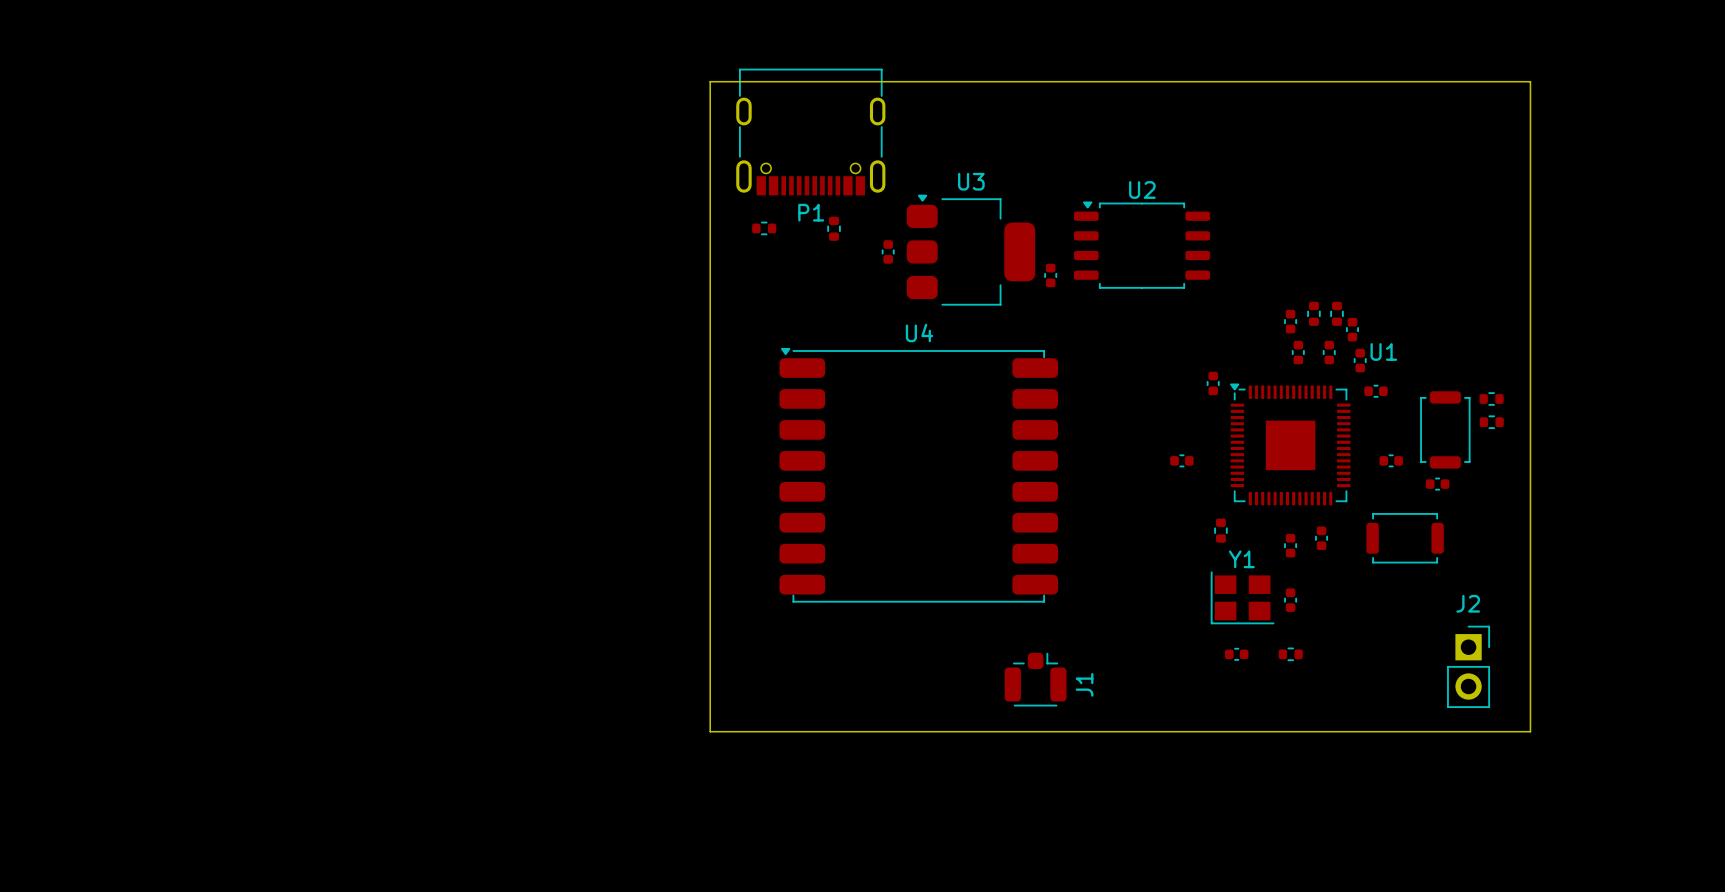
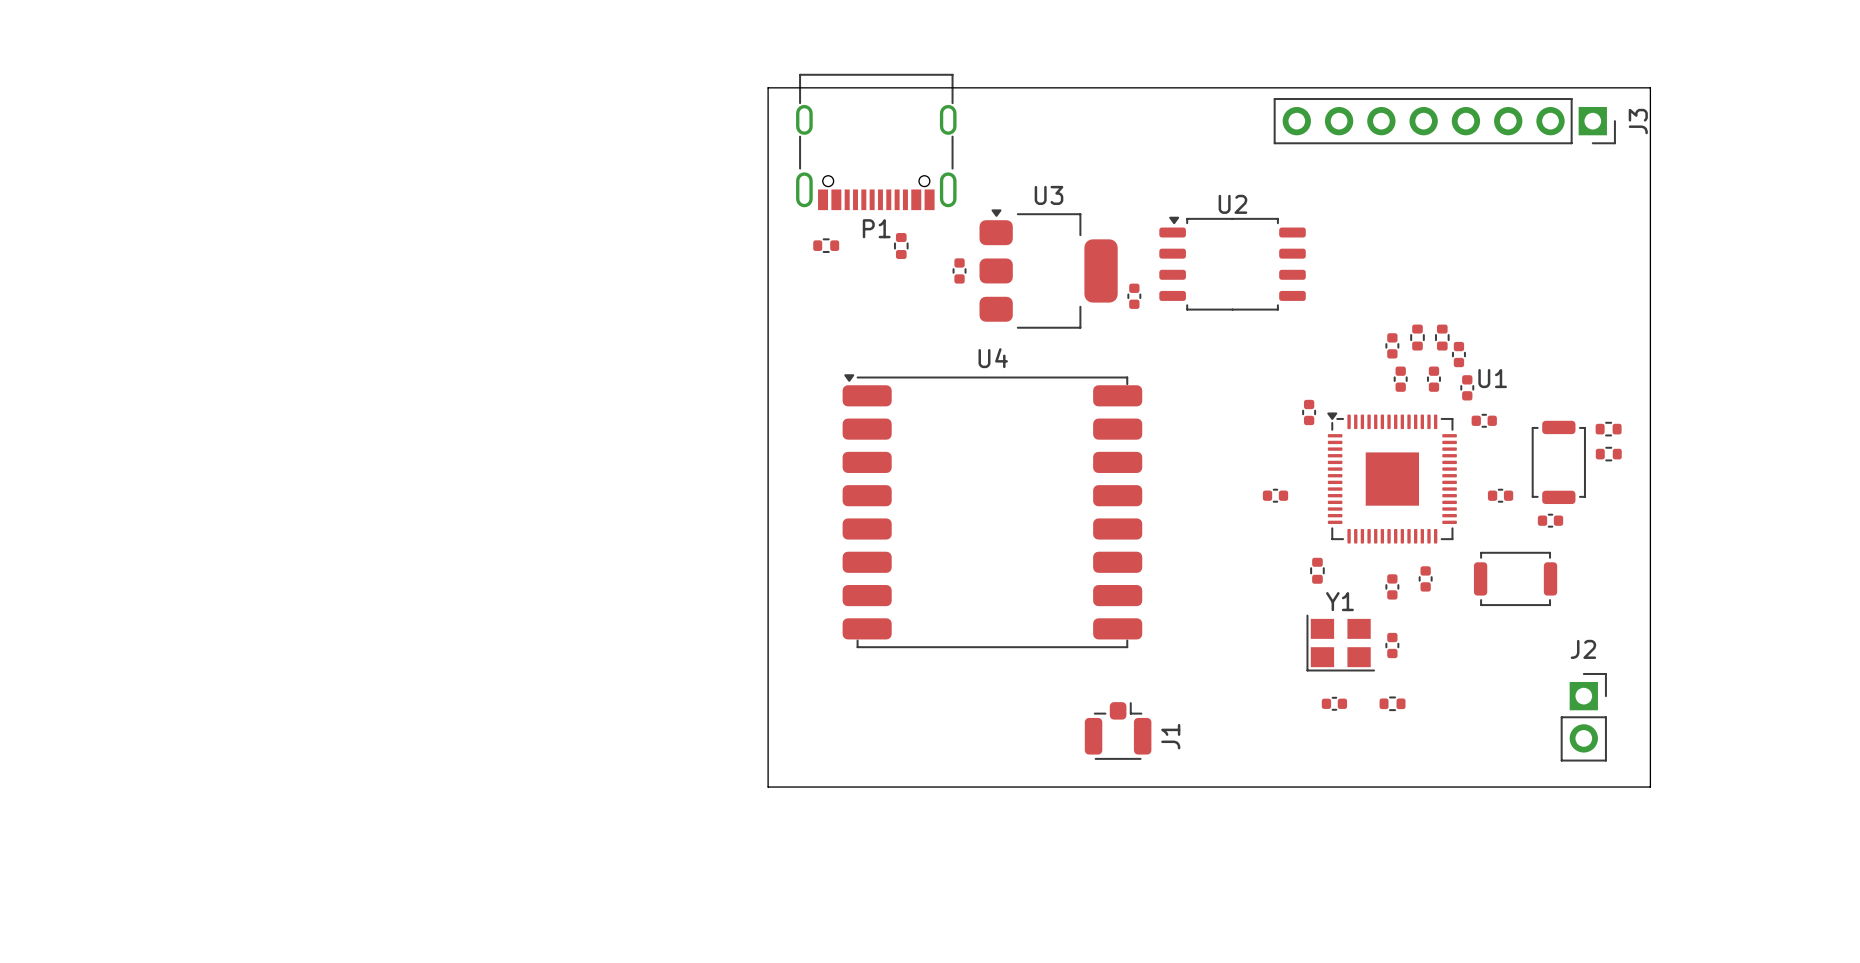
J3: none -> (1444, 121)

